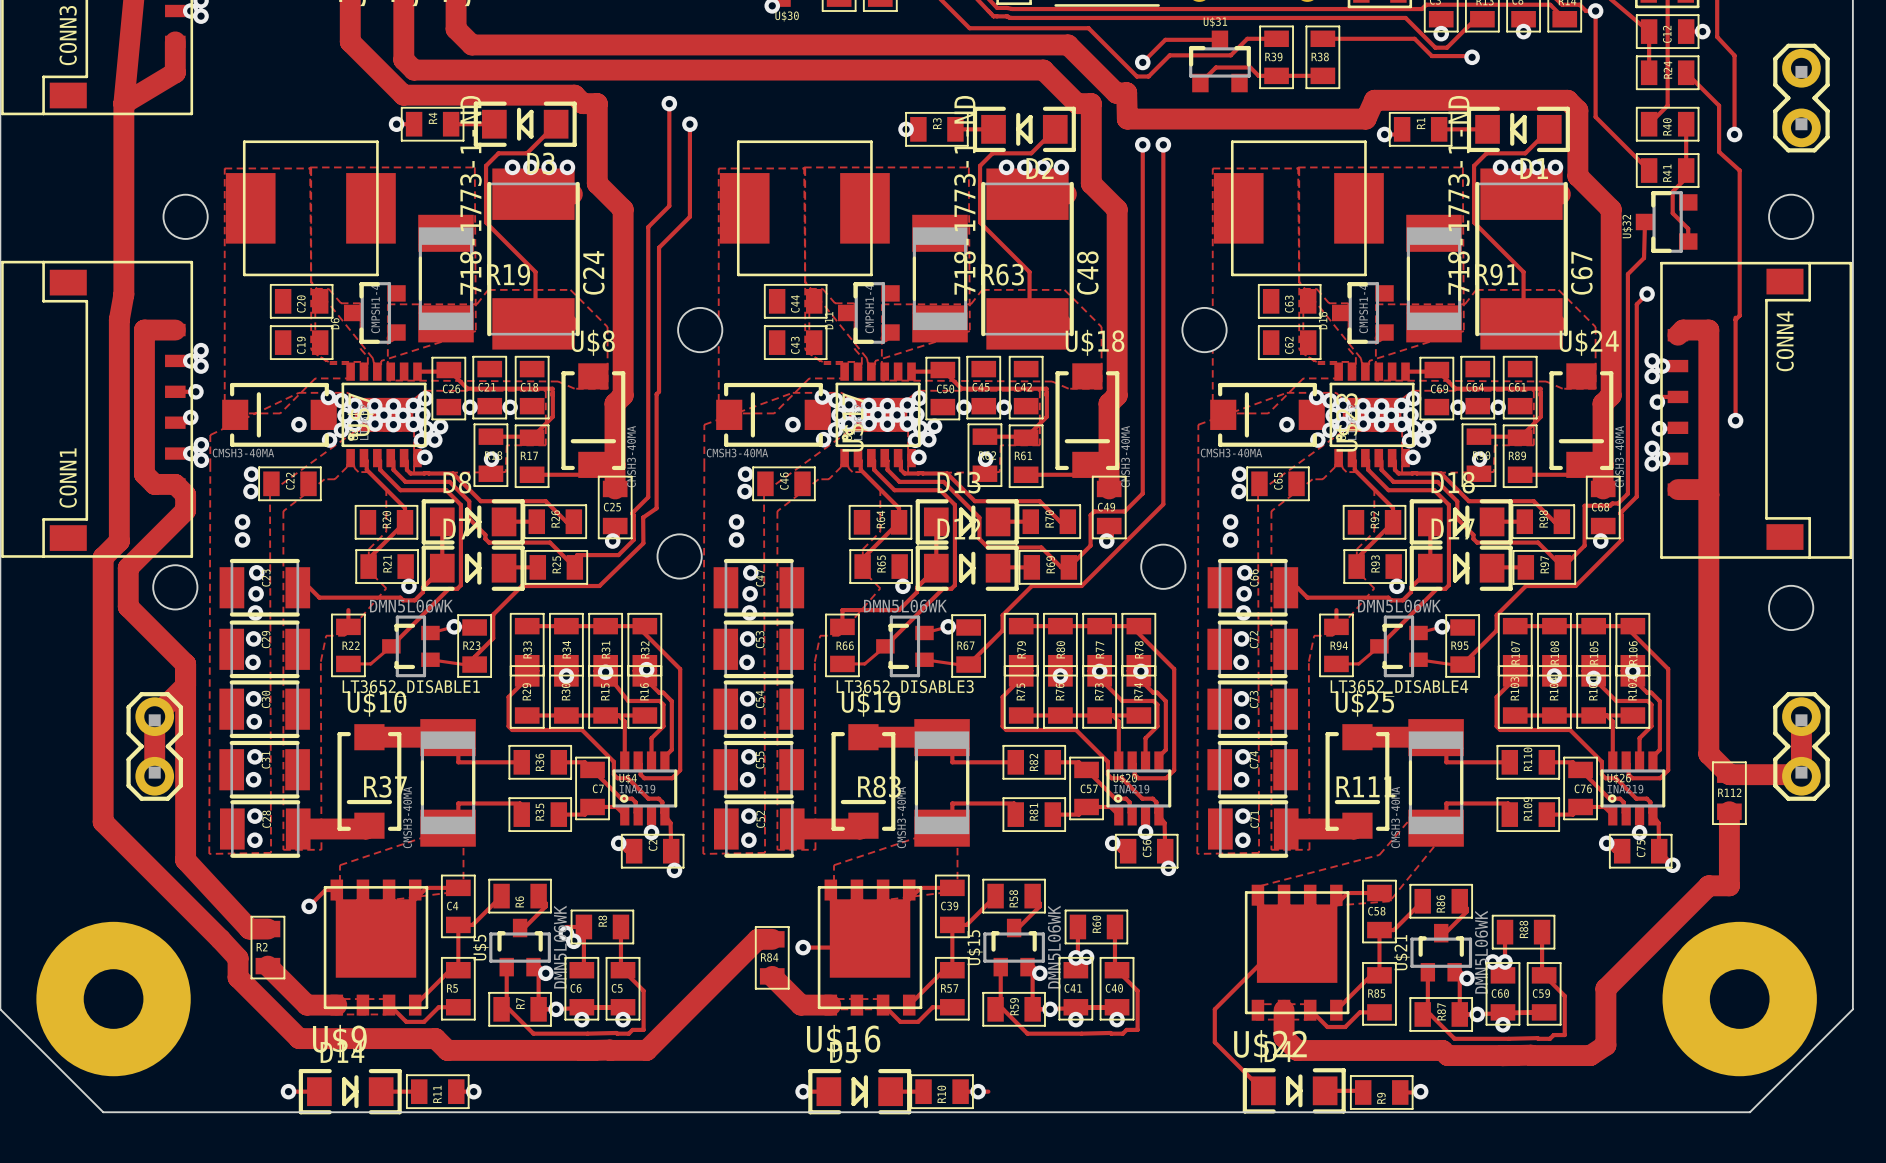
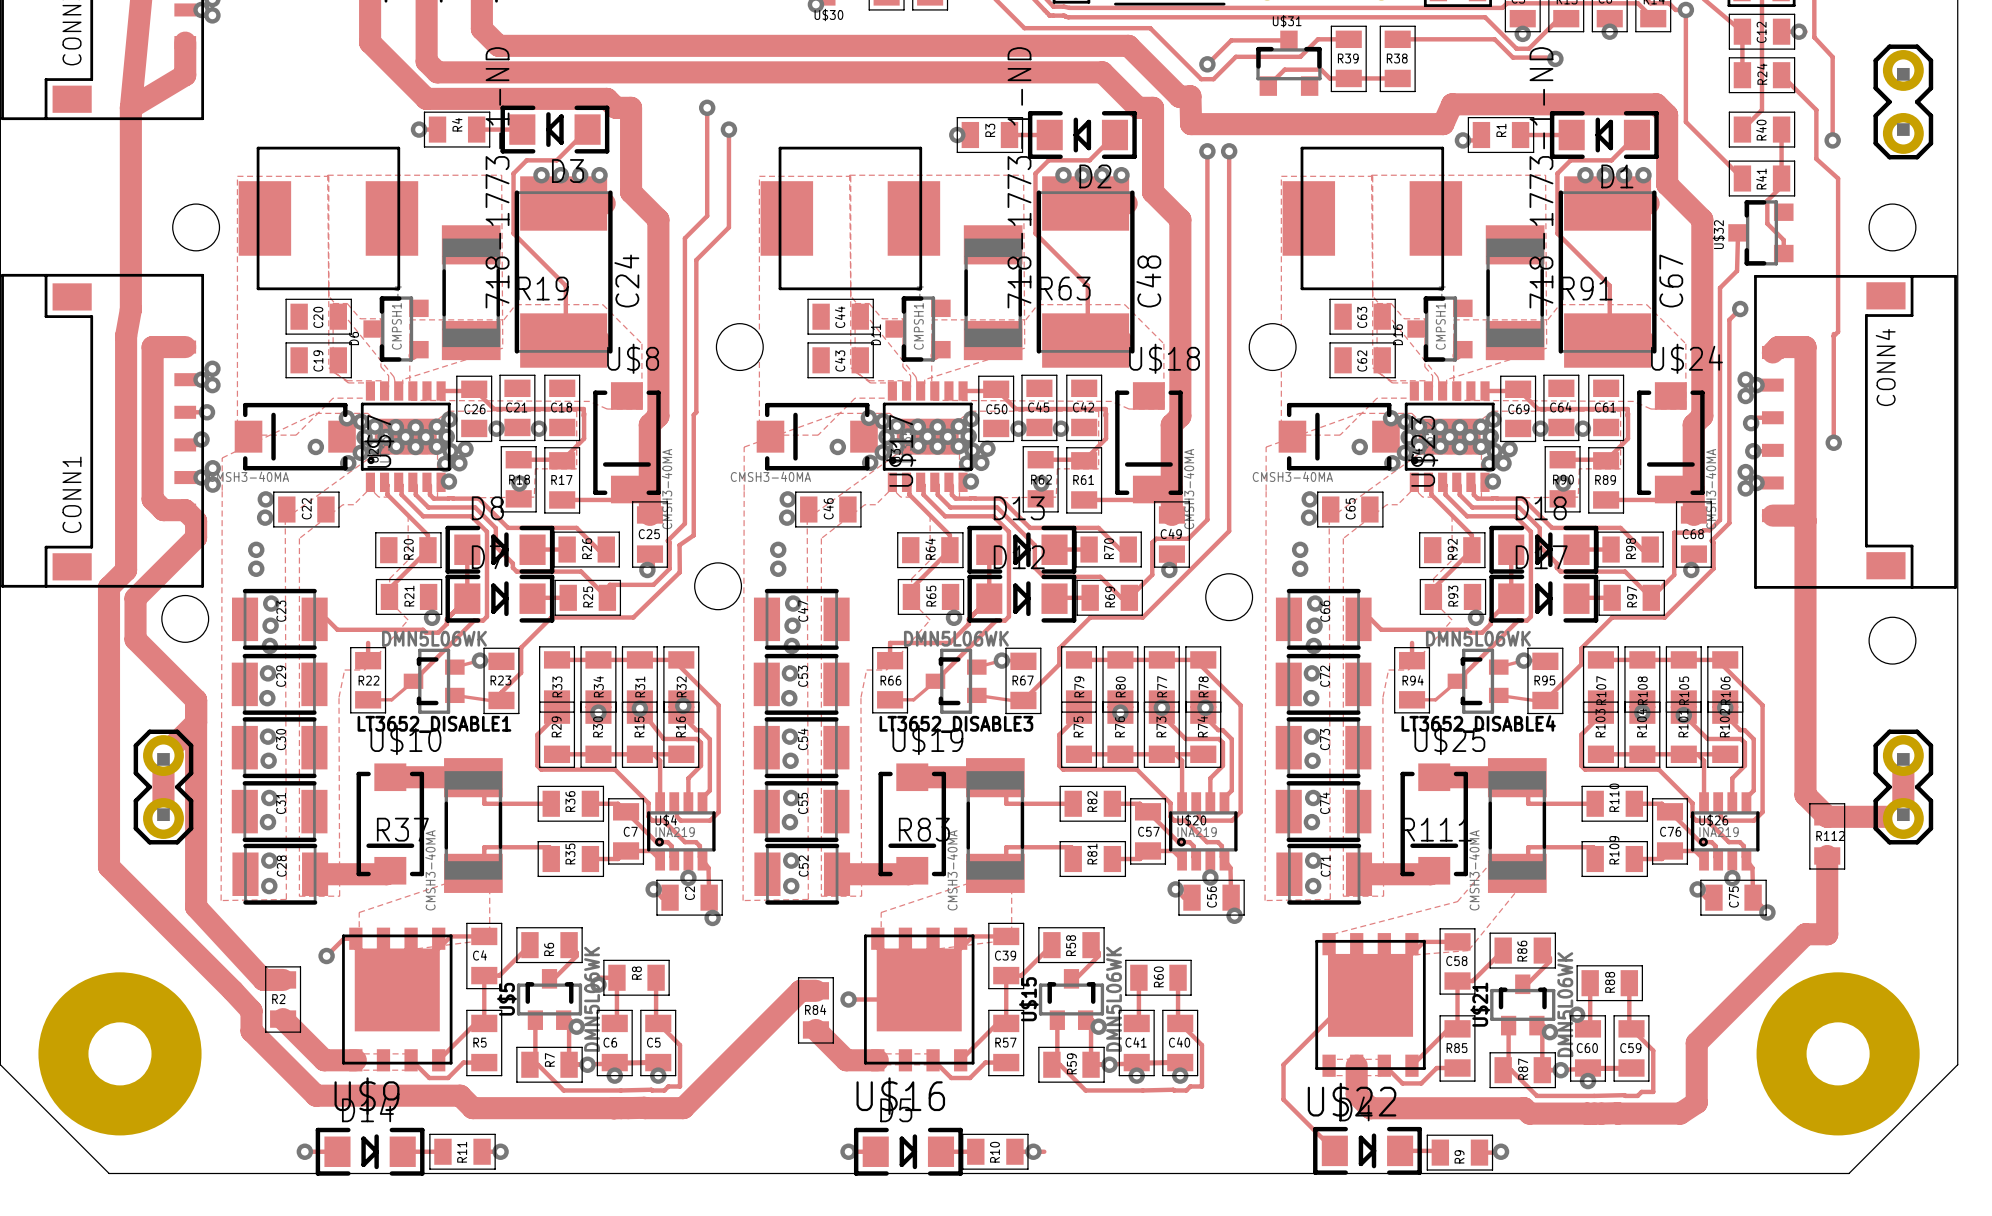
via: (573, 941) -> none
via: (1075, 957) -> none
via: (1086, 957) -> none
via: (1505, 961) -> none

